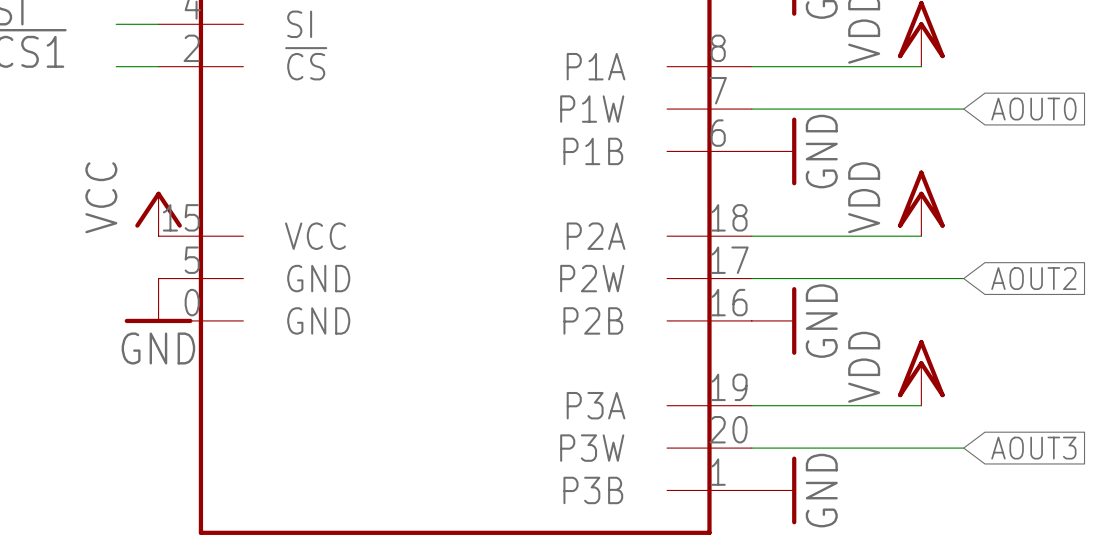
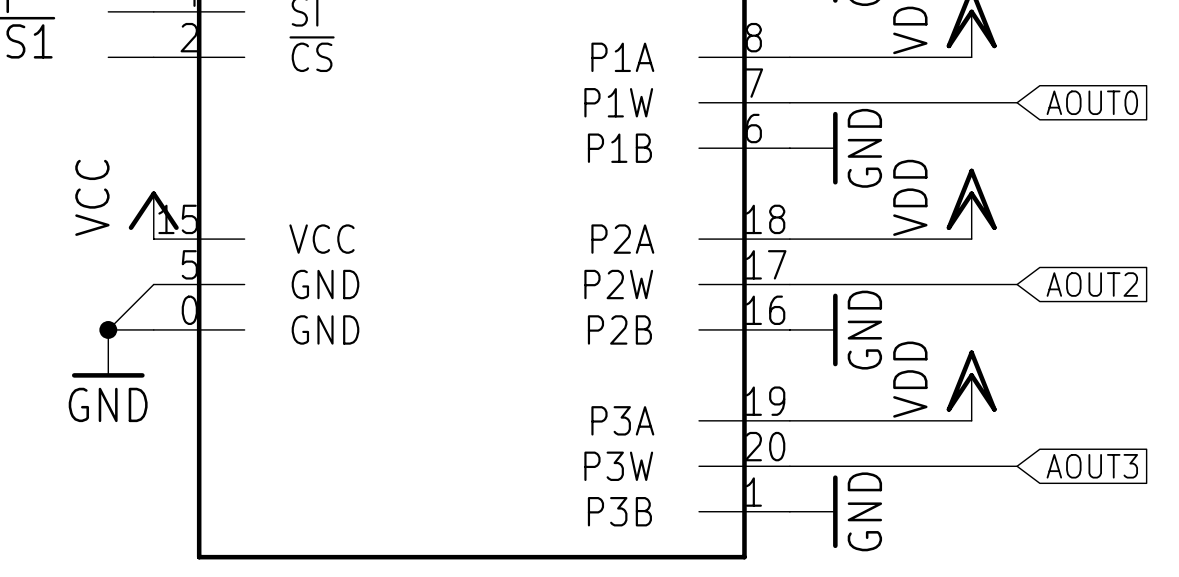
wire: none -> (153, 284) (108, 329) (153, 329)
power symbol position: GND (158, 300) -> GND (108, 353)
junction: none -> (108, 329)

